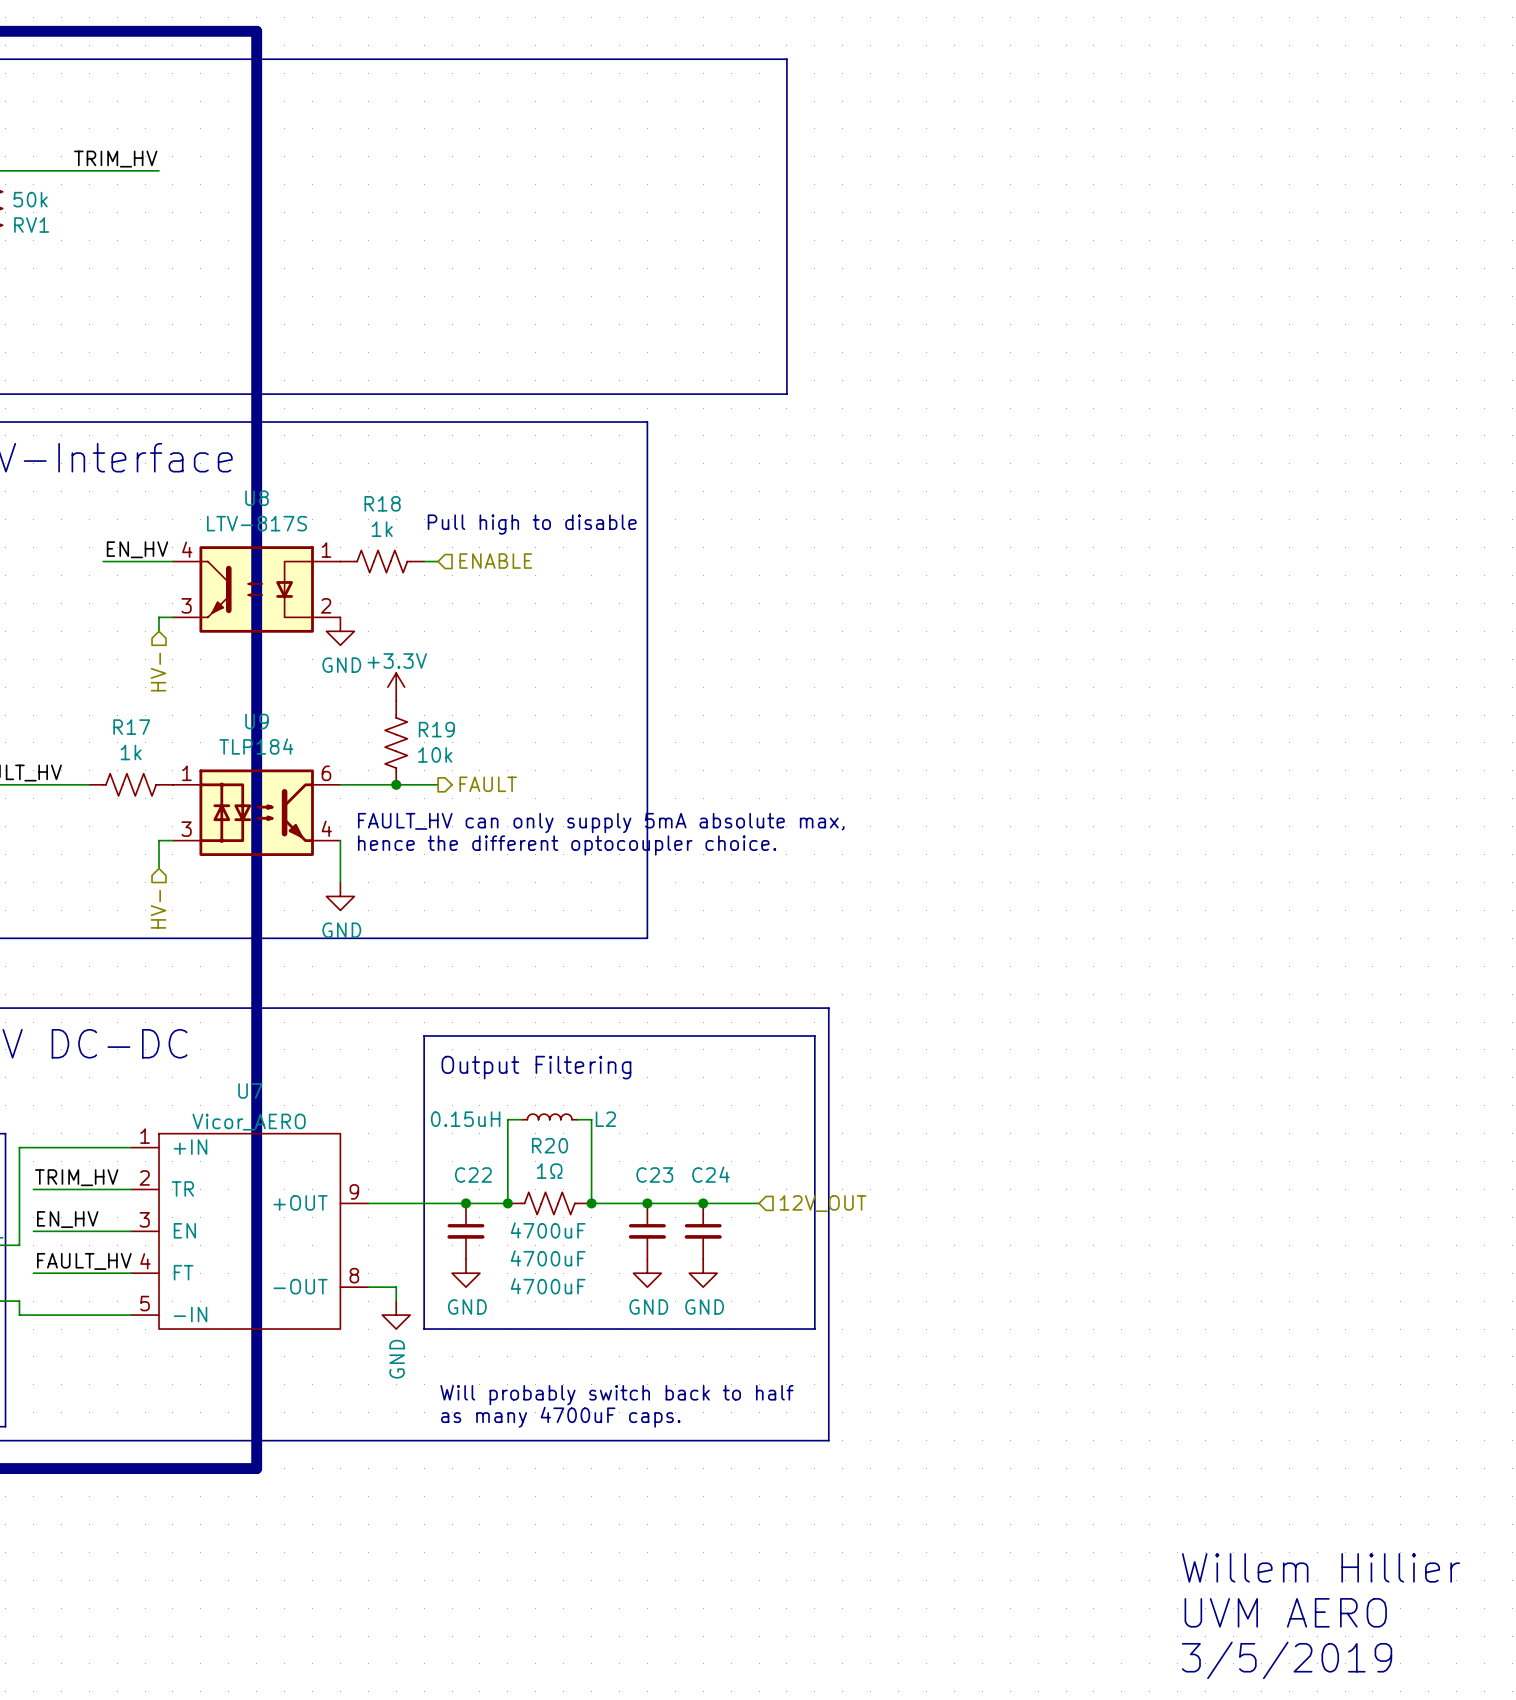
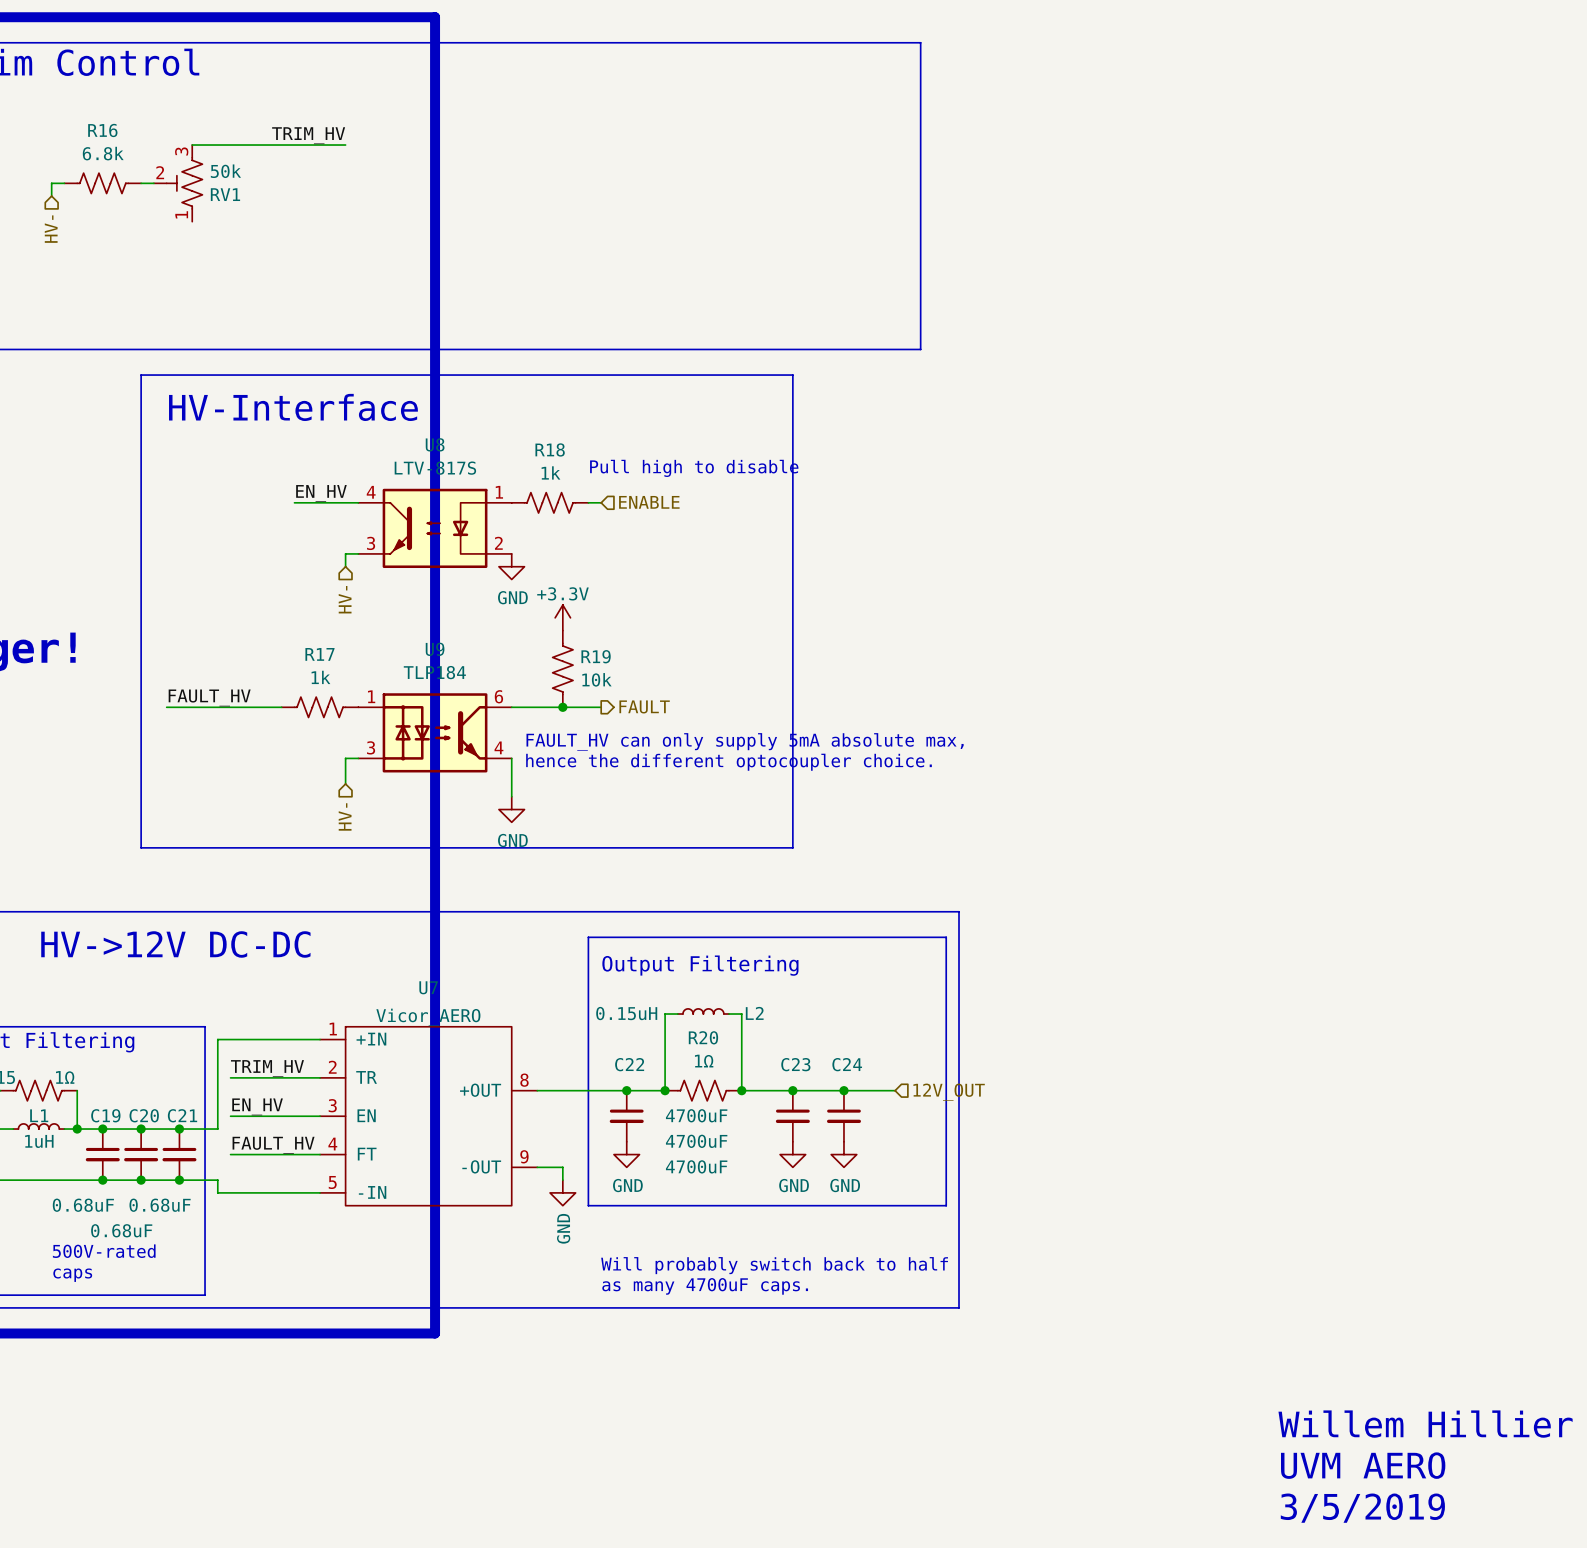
U7 pin number: 9 (354, 1191) -> 8 (524, 1080)
U7 pin number: 8 (354, 1275) -> 9 (524, 1156)

